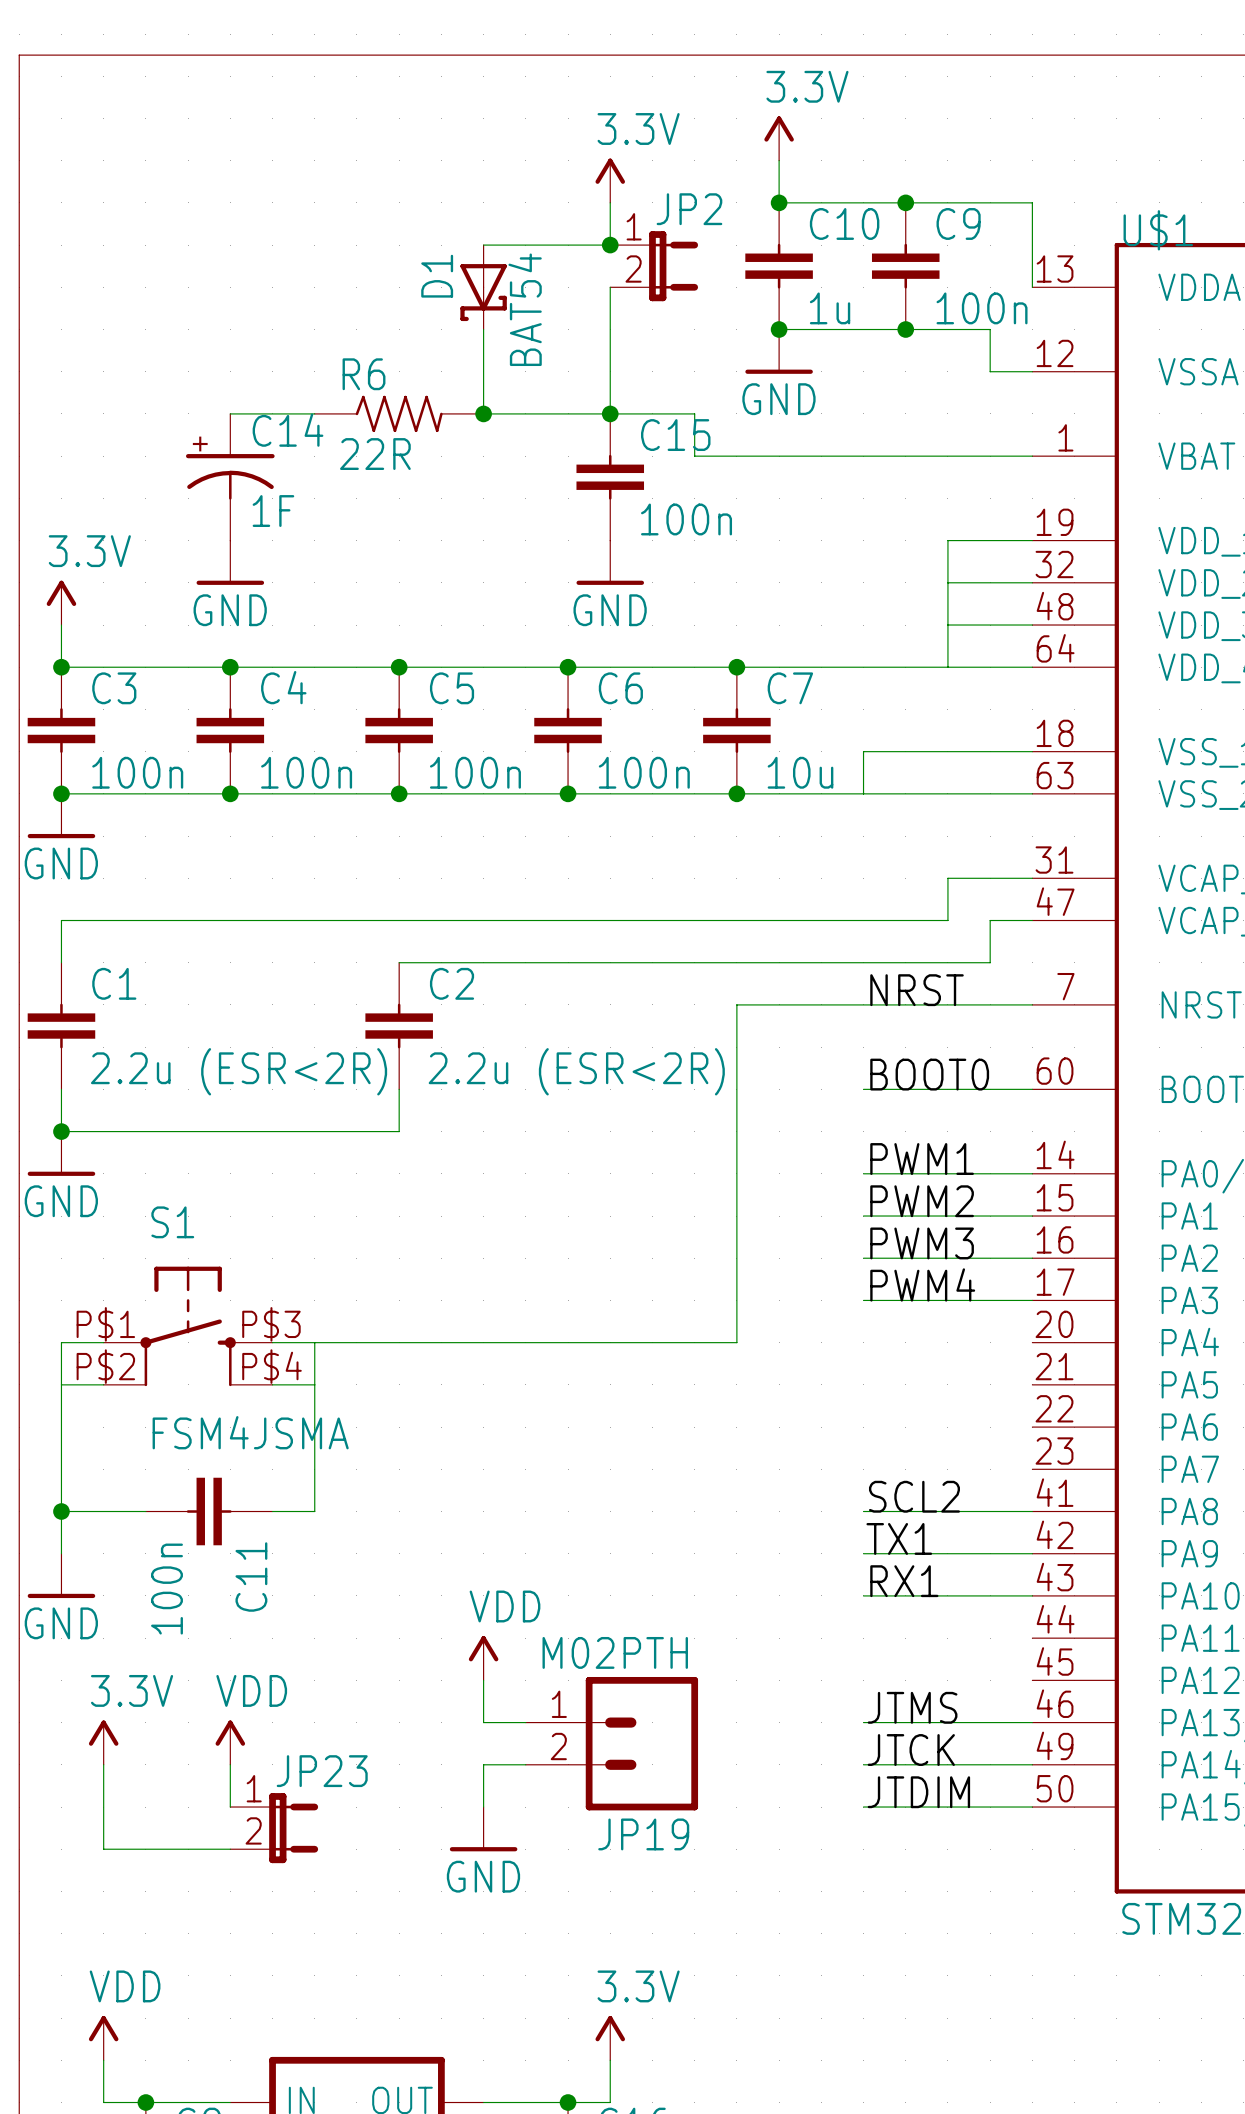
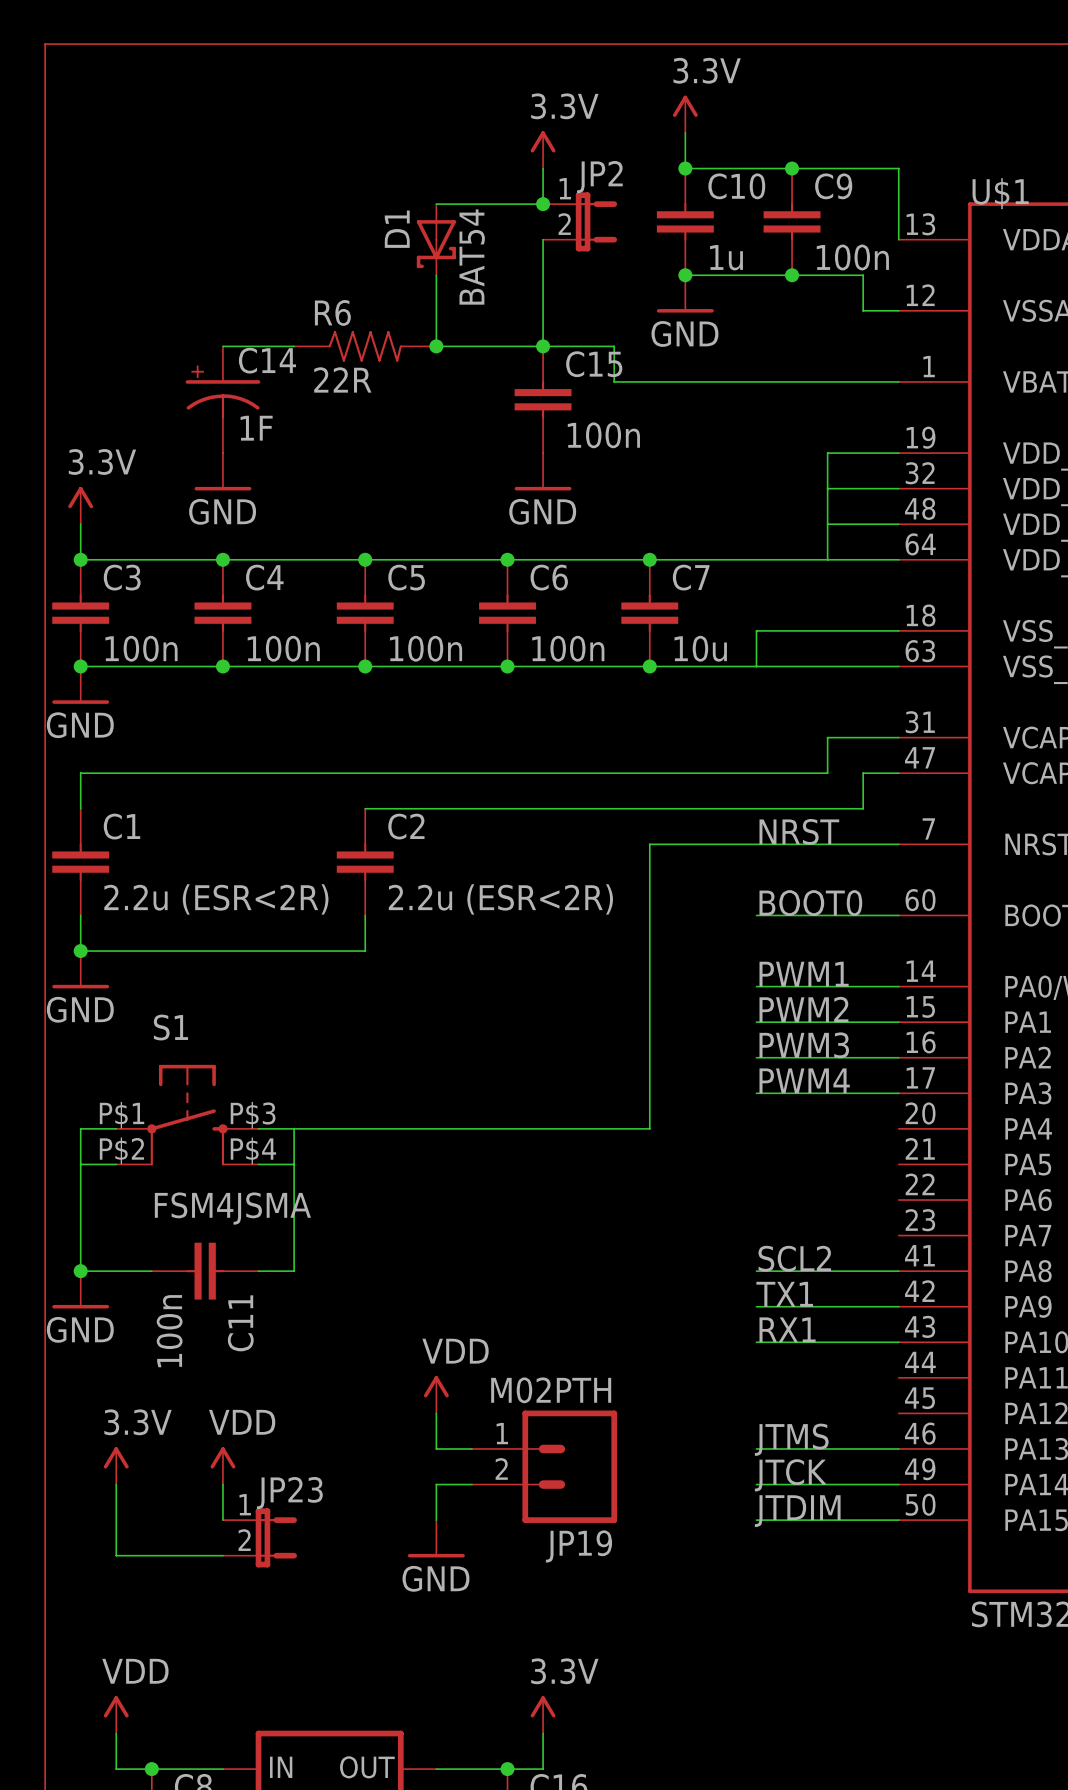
power symbol position: GND (61, 1575) -> GND (80, 1289)

